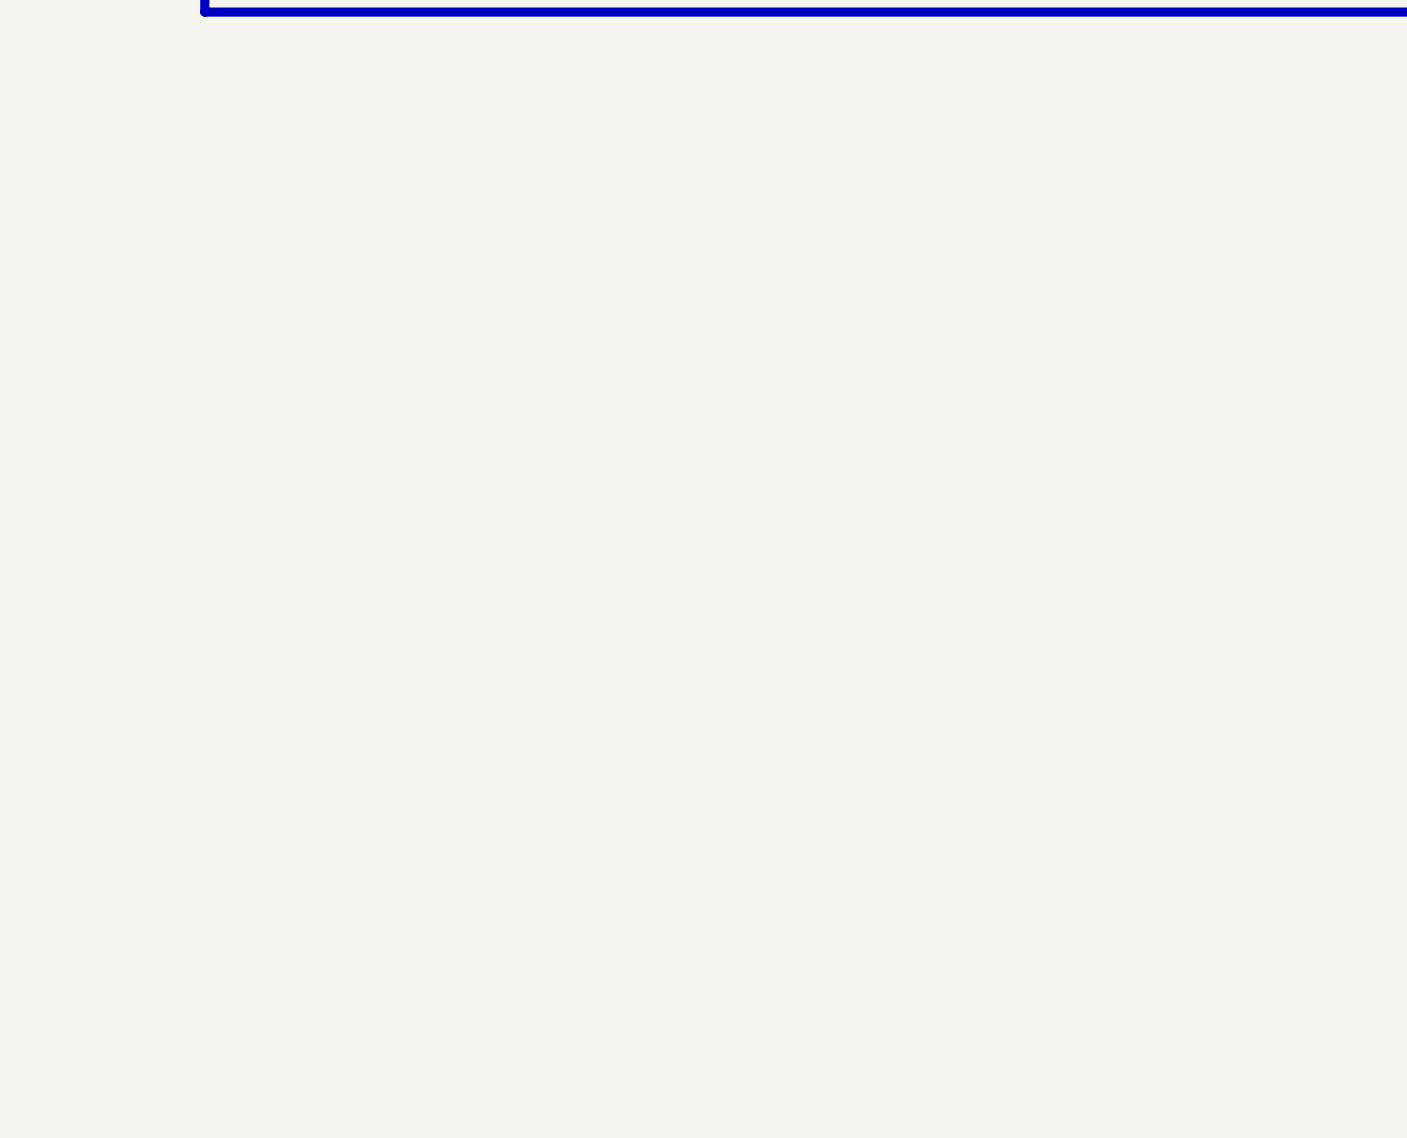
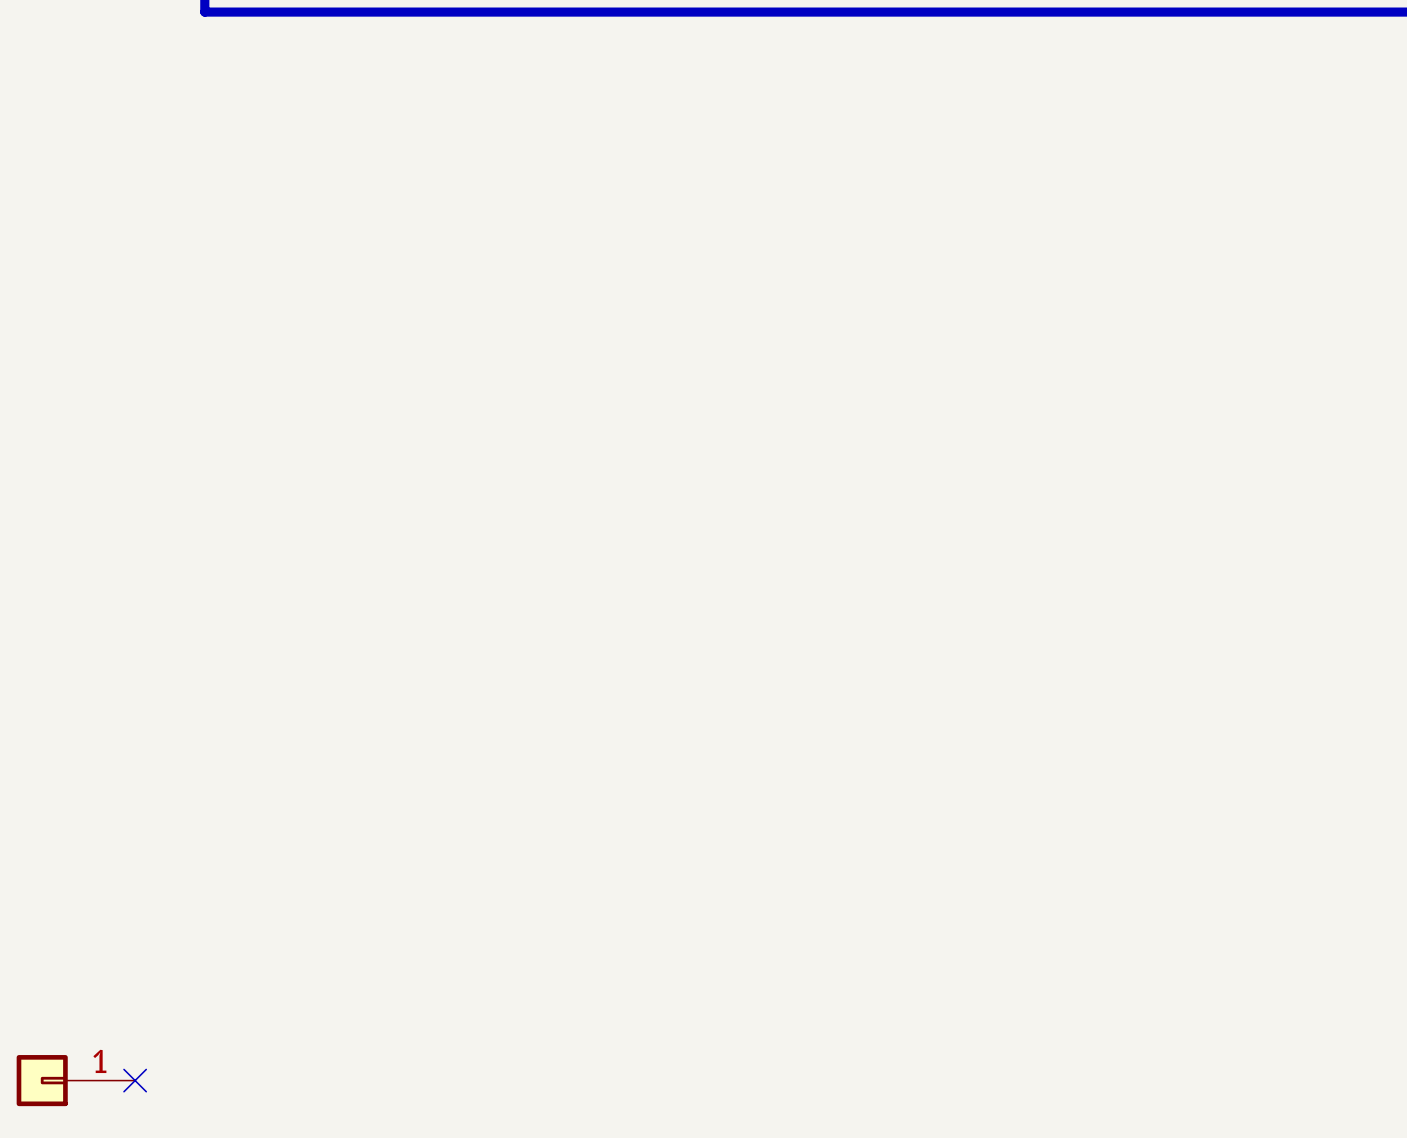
part: none -> (75, 1080)
no-connect mark: none -> (135, 1080)

